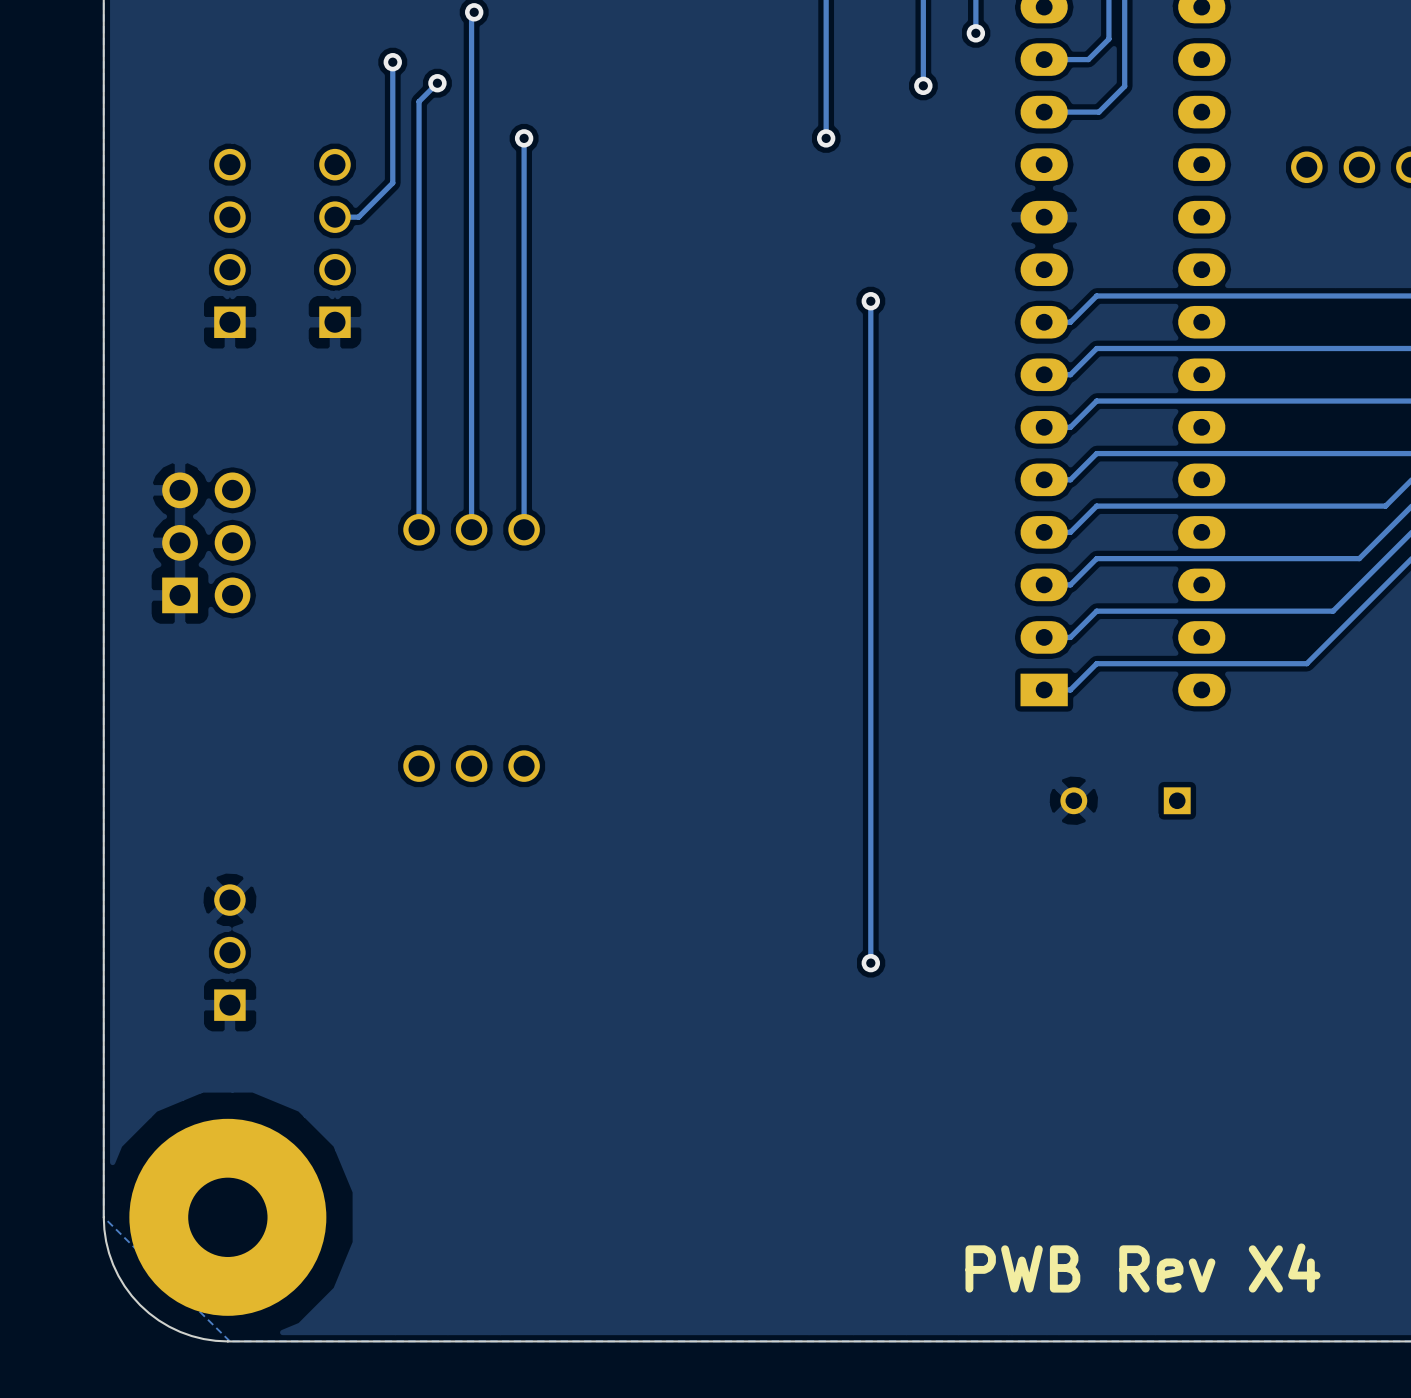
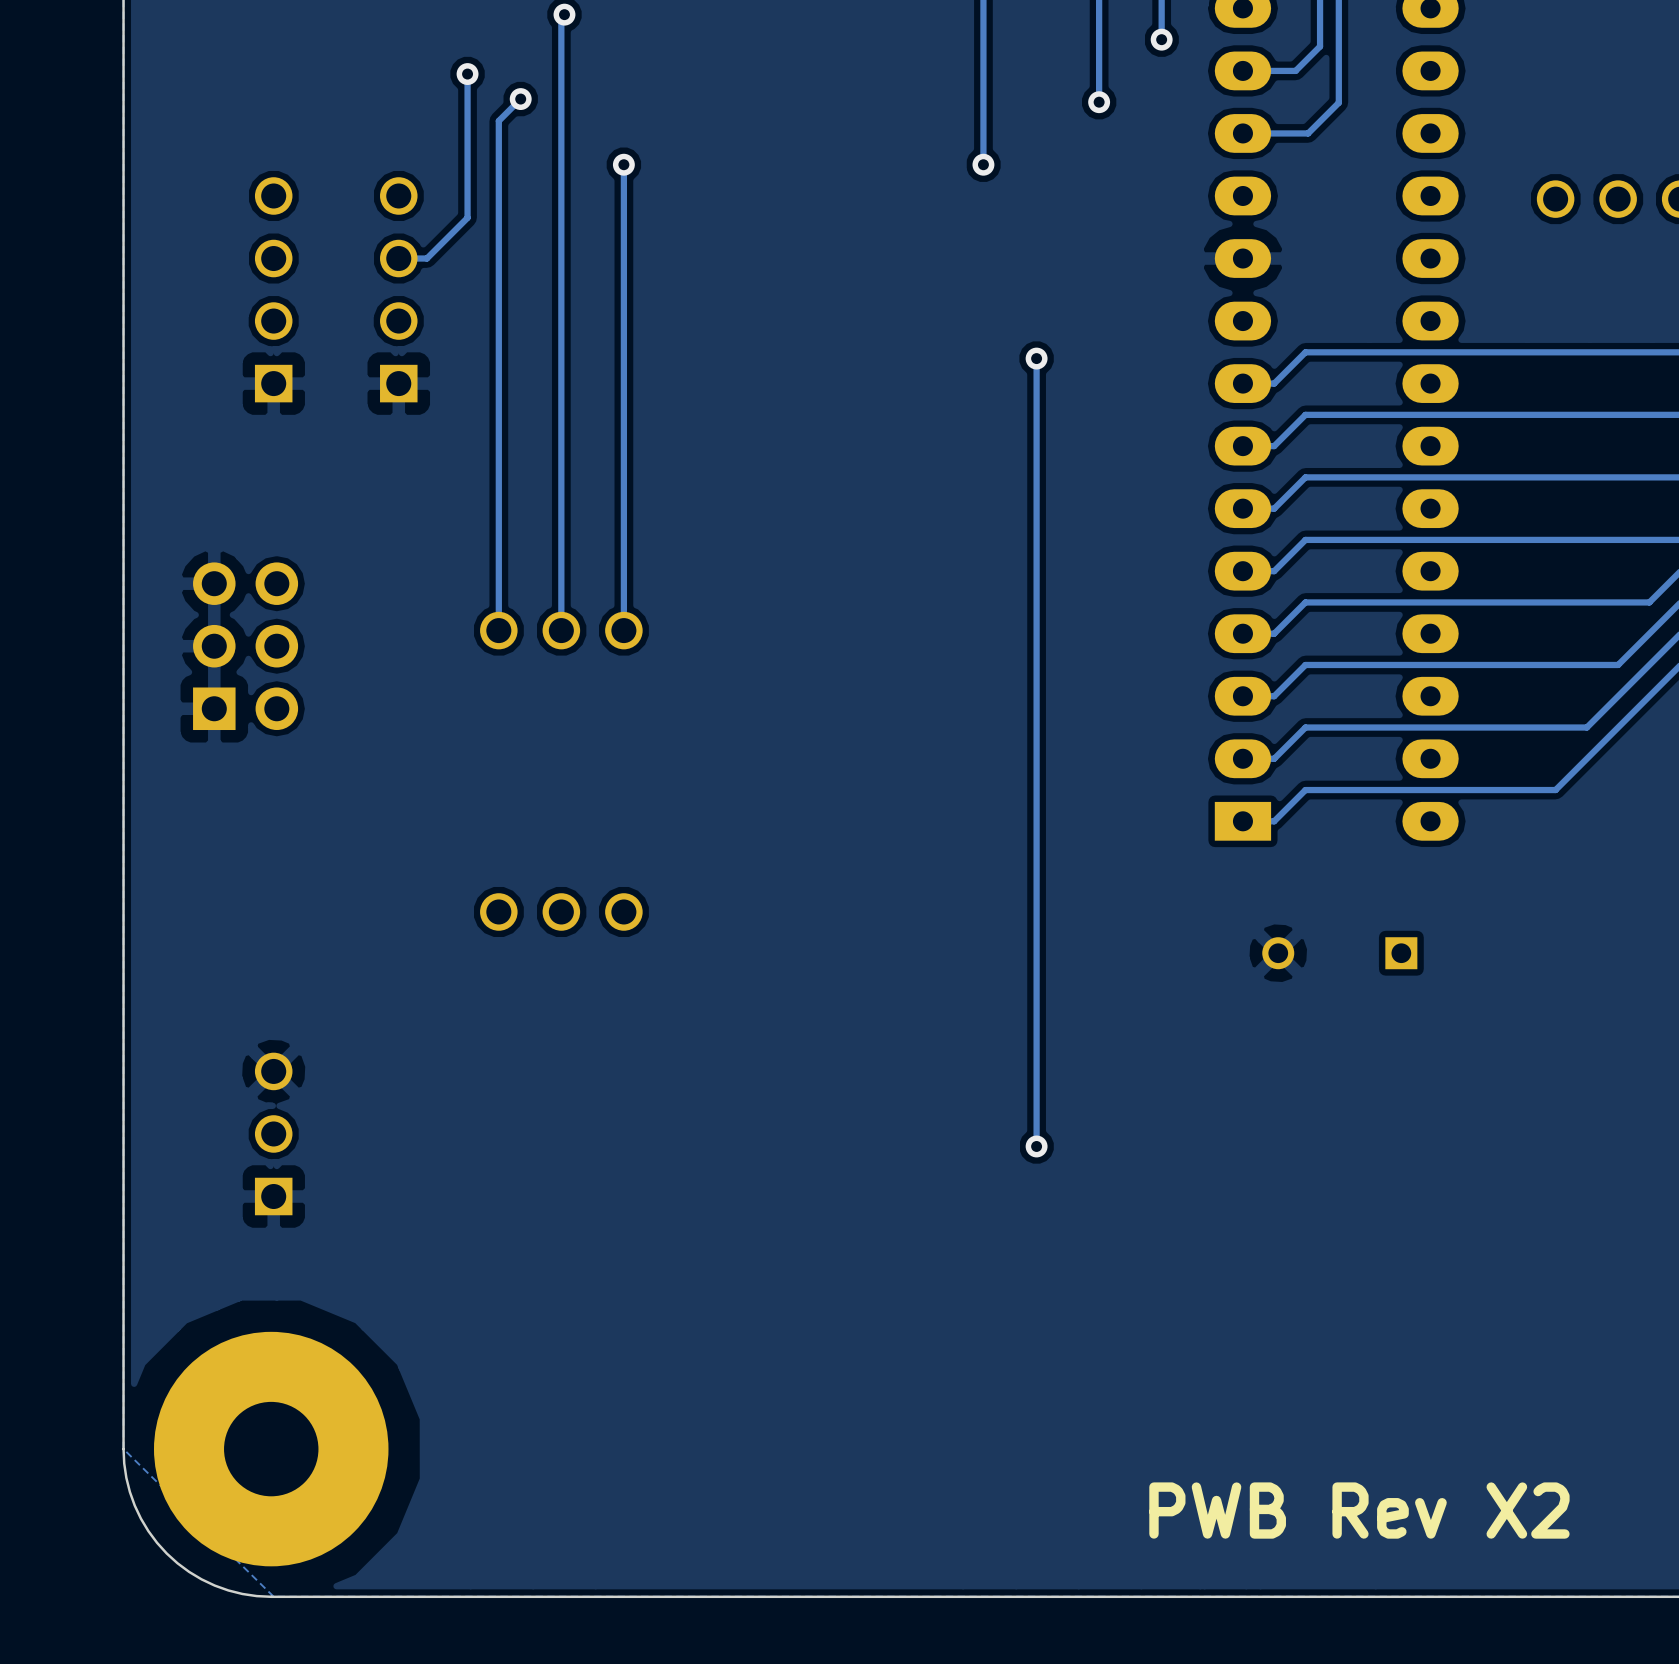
text: PWB Rev X4 (1142, 1268) -> PWB Rev X2 (1359, 1510)

